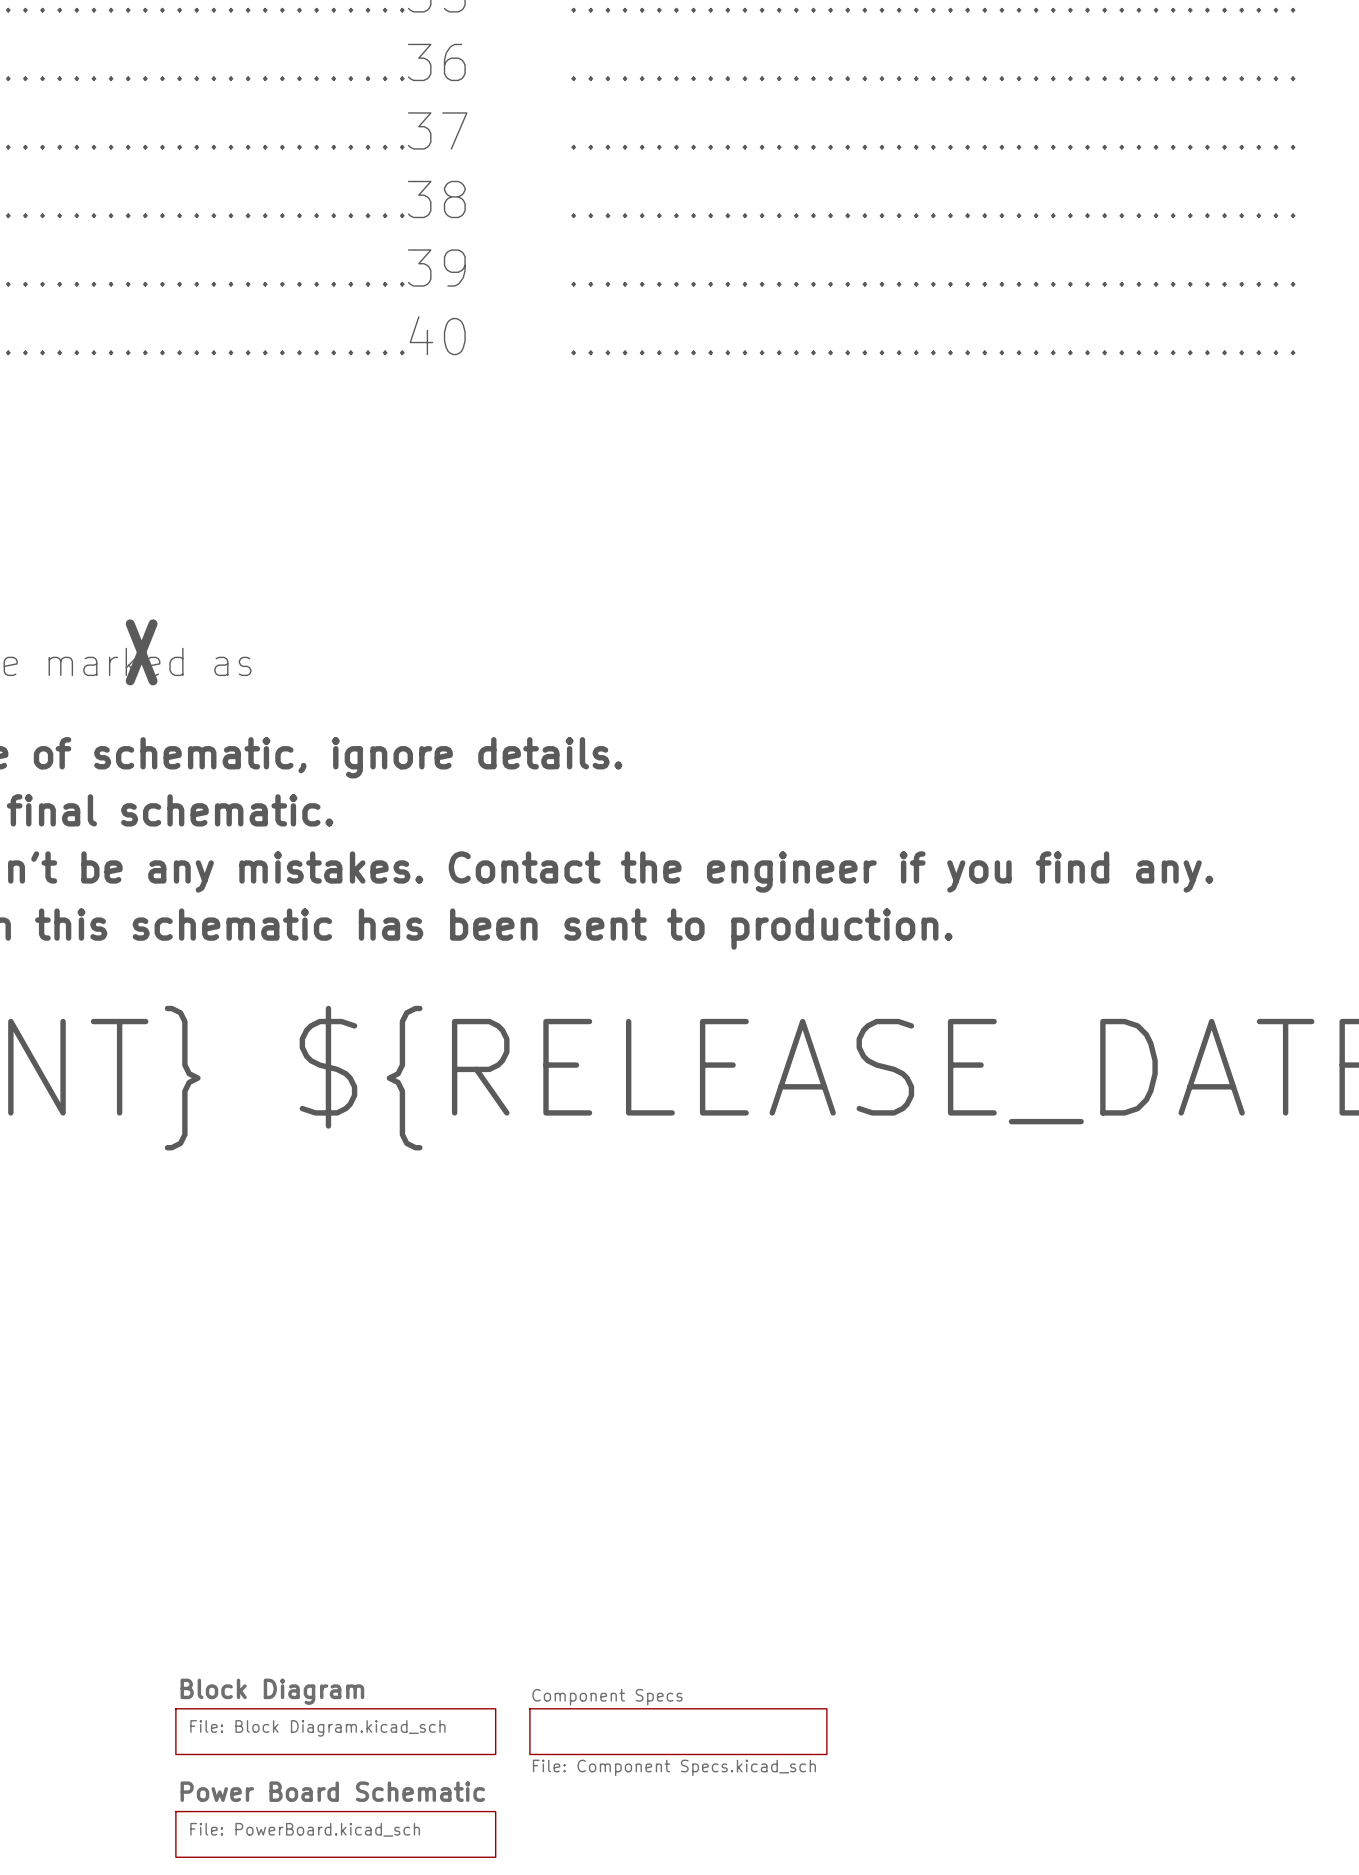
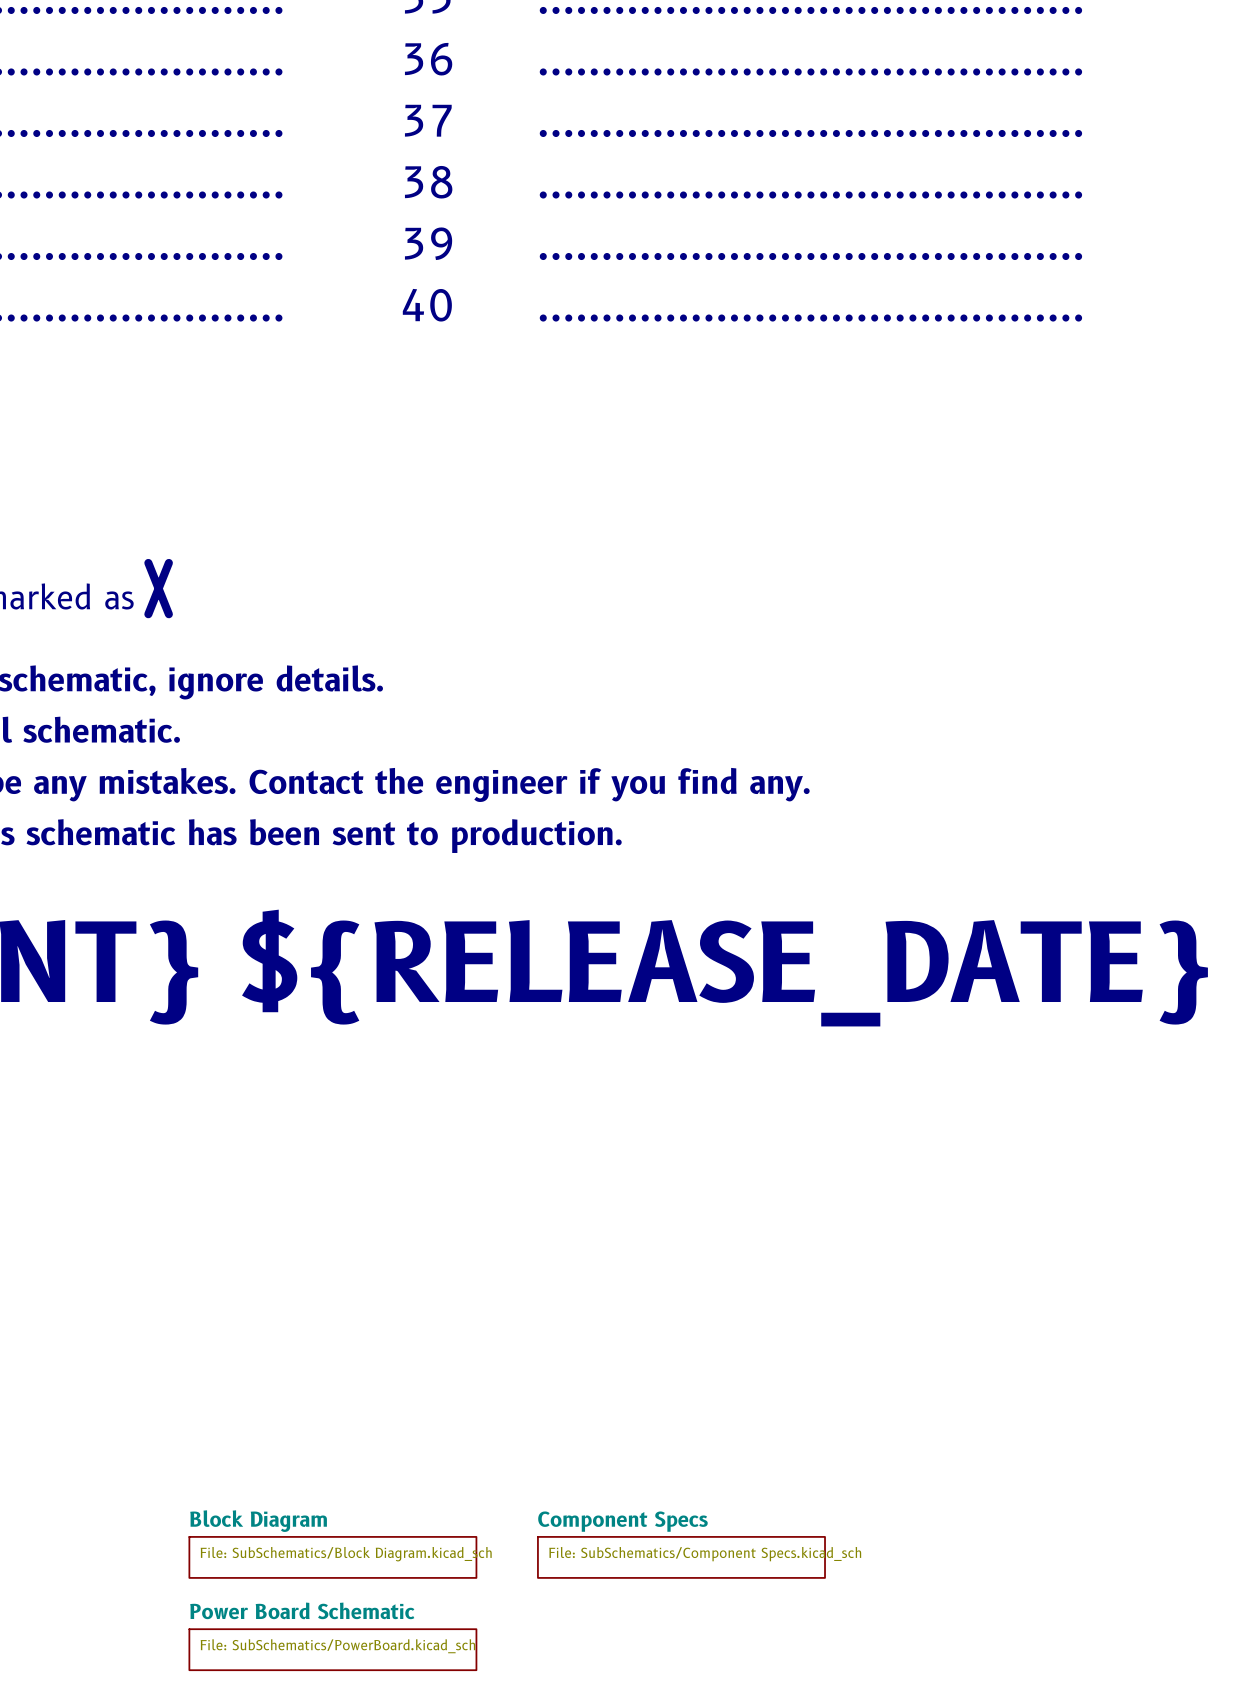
sheet Block Diagram value: File: Block Diagram.kicad_sch (317, 1728) -> File: SubSchematics/Block Diagram.kicad_sch (346, 1554)
sheet Component Specs: File: Component Specs.kicad_sch (678, 1731) -> none
sheet Component Specs: none -> File: SubSchematics/Component Specs.kicad_sch (681, 1557)
sheet Power Board Schematic value: File: PowerBoard.kicad_sch (305, 1829) -> File: SubSchematics/PowerBoard.kicad_sch (337, 1646)

